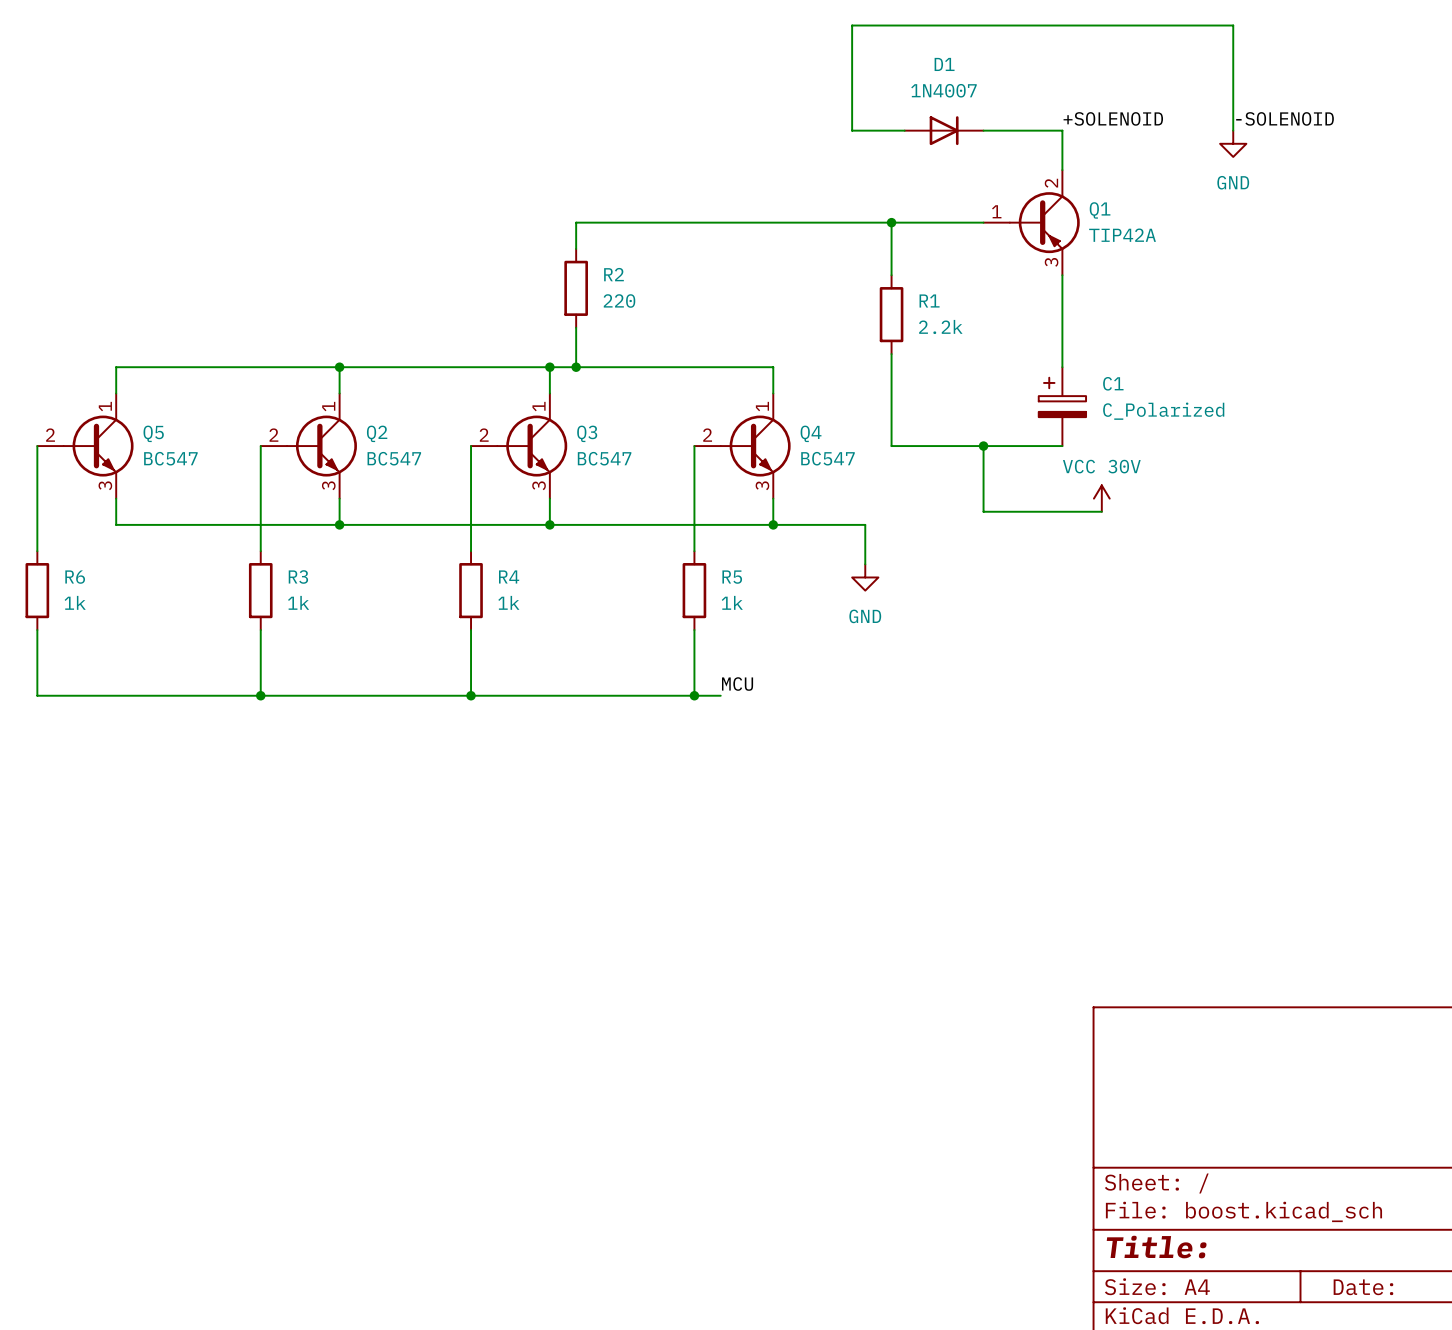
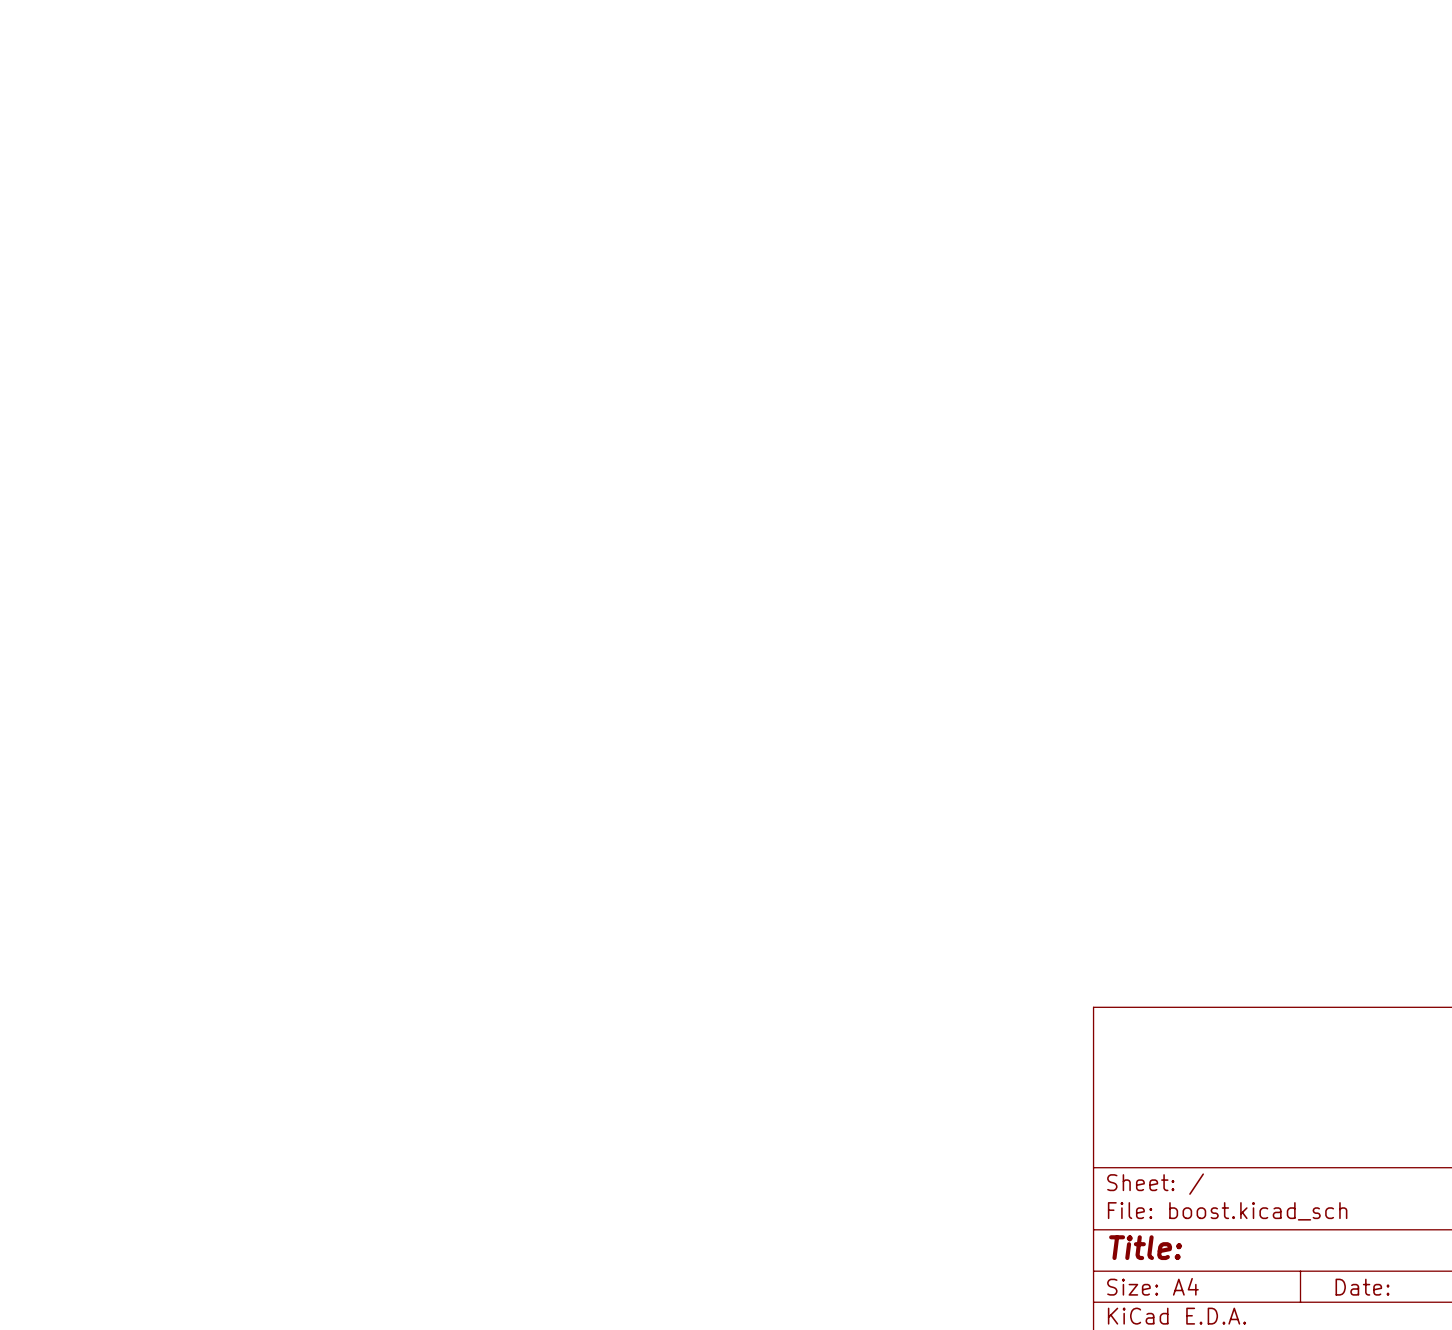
label: +SOLENOID (1113, 118) -> none
label: -SOLENOID (1285, 118) -> none
wire: (904, 130) (852, 130) (852, 25) (1233, 25) (1233, 130) -> none
D1: 1N4007 (944, 130) -> none
wire: (983, 130) (1062, 130) (1062, 170) -> none
power symbol: GND (1233, 143) -> none
wire: (891, 222) (891, 275) -> none
junction: (891, 222) -> none
wire: (983, 222) (576, 222) (576, 248) -> none
Q1: TIP42A (1031, 222) -> none
wire: (1062, 275) (1062, 367) -> none
R2: 220 (576, 288) -> none
R1: 2.2k (891, 314) -> none
wire: (576, 327) (576, 367) -> none
wire: (891, 354) (891, 446) (1062, 446) -> none
wire: (339, 367) (339, 393) -> none
junction: (339, 367) -> none
wire: (549, 367) (549, 393) -> none
junction: (549, 367) -> none
junction: (576, 367) -> none
wire: (116, 393) (116, 367) (773, 367) (773, 393) -> none
C1: C_Polarized (1062, 406) -> none
wire: (37, 446) (37, 551) -> none
Q5: BC547 (85, 446) -> none
wire: (260, 446) (260, 551) -> none
Q2: BC547 (308, 446) -> none
wire: (471, 446) (471, 551) -> none
Q3: BC547 (519, 446) -> none
wire: (694, 446) (694, 551) -> none
Q4: BC547 (742, 446) -> none
wire: (983, 446) (983, 511) (1101, 511) -> none
junction: (983, 446) -> none
wire: (116, 498) (116, 524) (865, 524) (865, 564) -> none
wire: (339, 498) (339, 524) -> none
wire: (549, 498) (549, 524) -> none
wire: (773, 498) (773, 524) -> none
power symbol: VCC 30V (1101, 498) -> none
junction: (339, 524) -> none
junction: (549, 524) -> none
junction: (773, 524) -> none
power symbol: GND (865, 577) -> none
R6: 1k (37, 590) -> none
R3: 1k (260, 590) -> none
R4: 1k (471, 590) -> none
R5: 1k (694, 590) -> none
wire: (37, 630) (37, 695) (720, 695) -> none
wire: (260, 630) (260, 695) -> none
wire: (471, 630) (471, 695) -> none
wire: (694, 630) (694, 695) -> none
label: MCU (737, 684) -> none
junction: (260, 695) -> none
junction: (471, 695) -> none
junction: (694, 695) -> none

